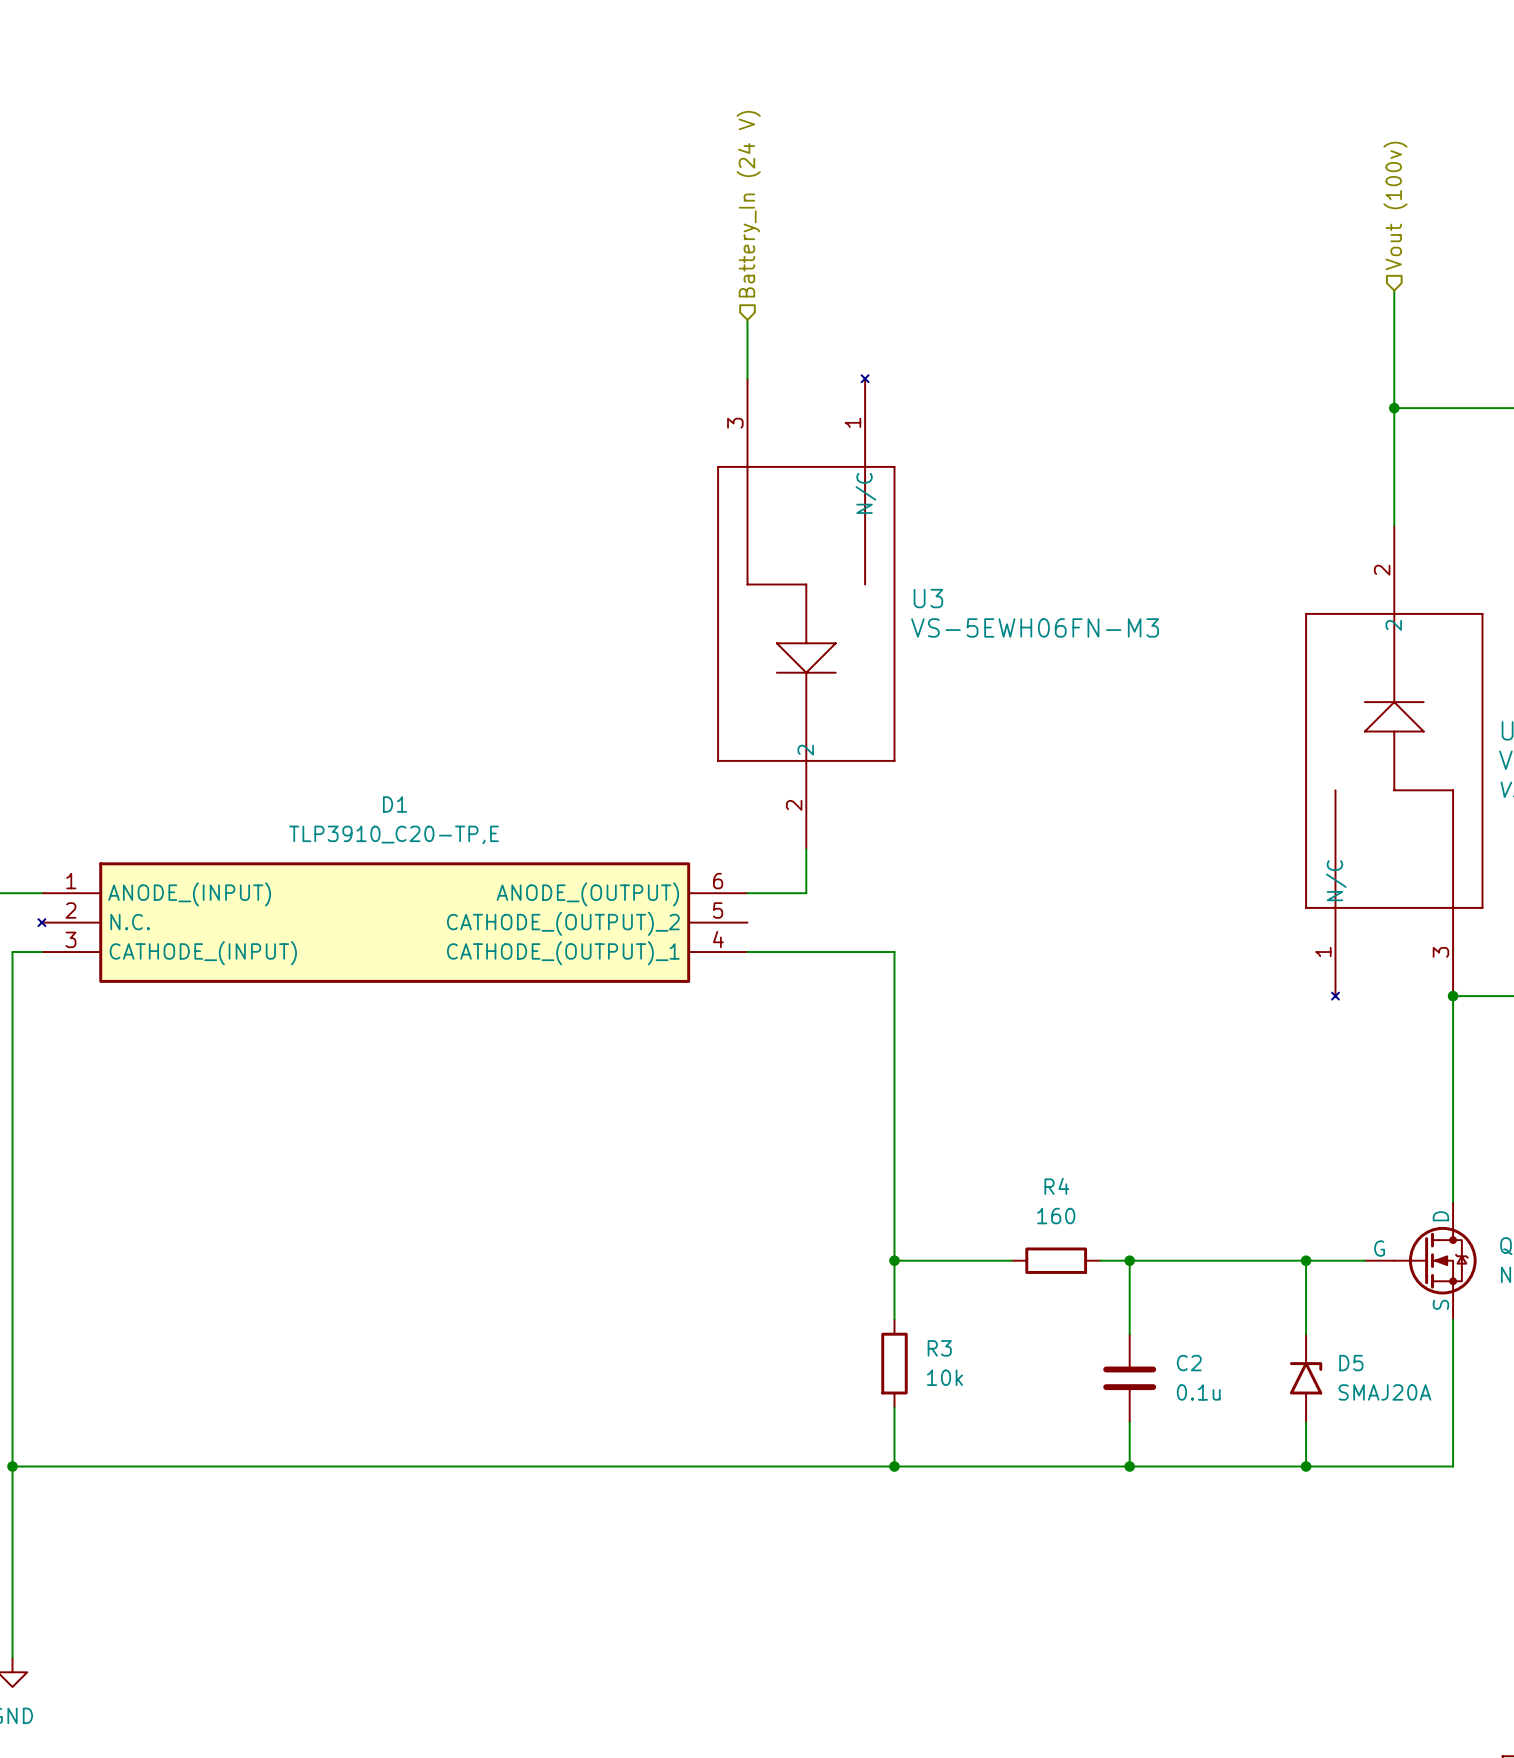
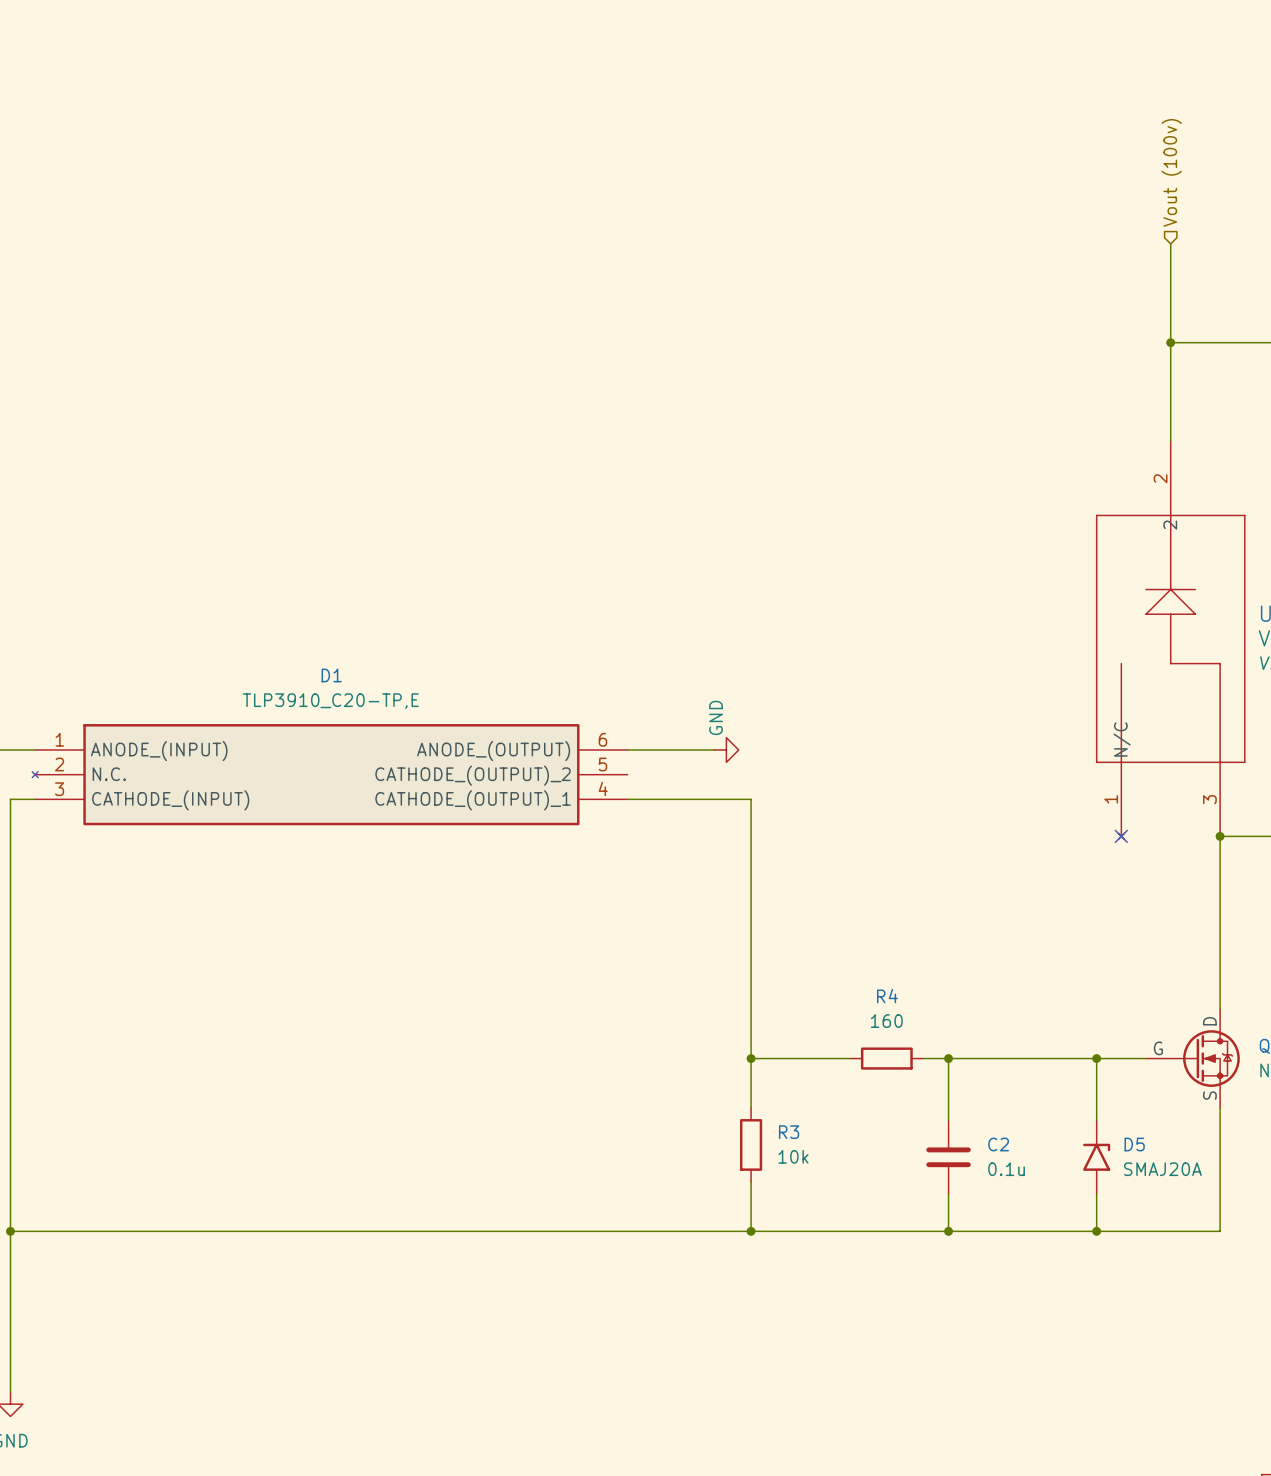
hierarchical label: Battery_In (24 V) (748, 204) -> none
wire: (747, 319) (747, 378) -> none
U3: VS-5EWH06FN-M3 (806, 612) -> none
wire: (806, 849) (806, 893) -> (714, 749) (677, 749)
power symbol: none -> GND (726, 749)
no-connect mark: none -> (1121, 836)

